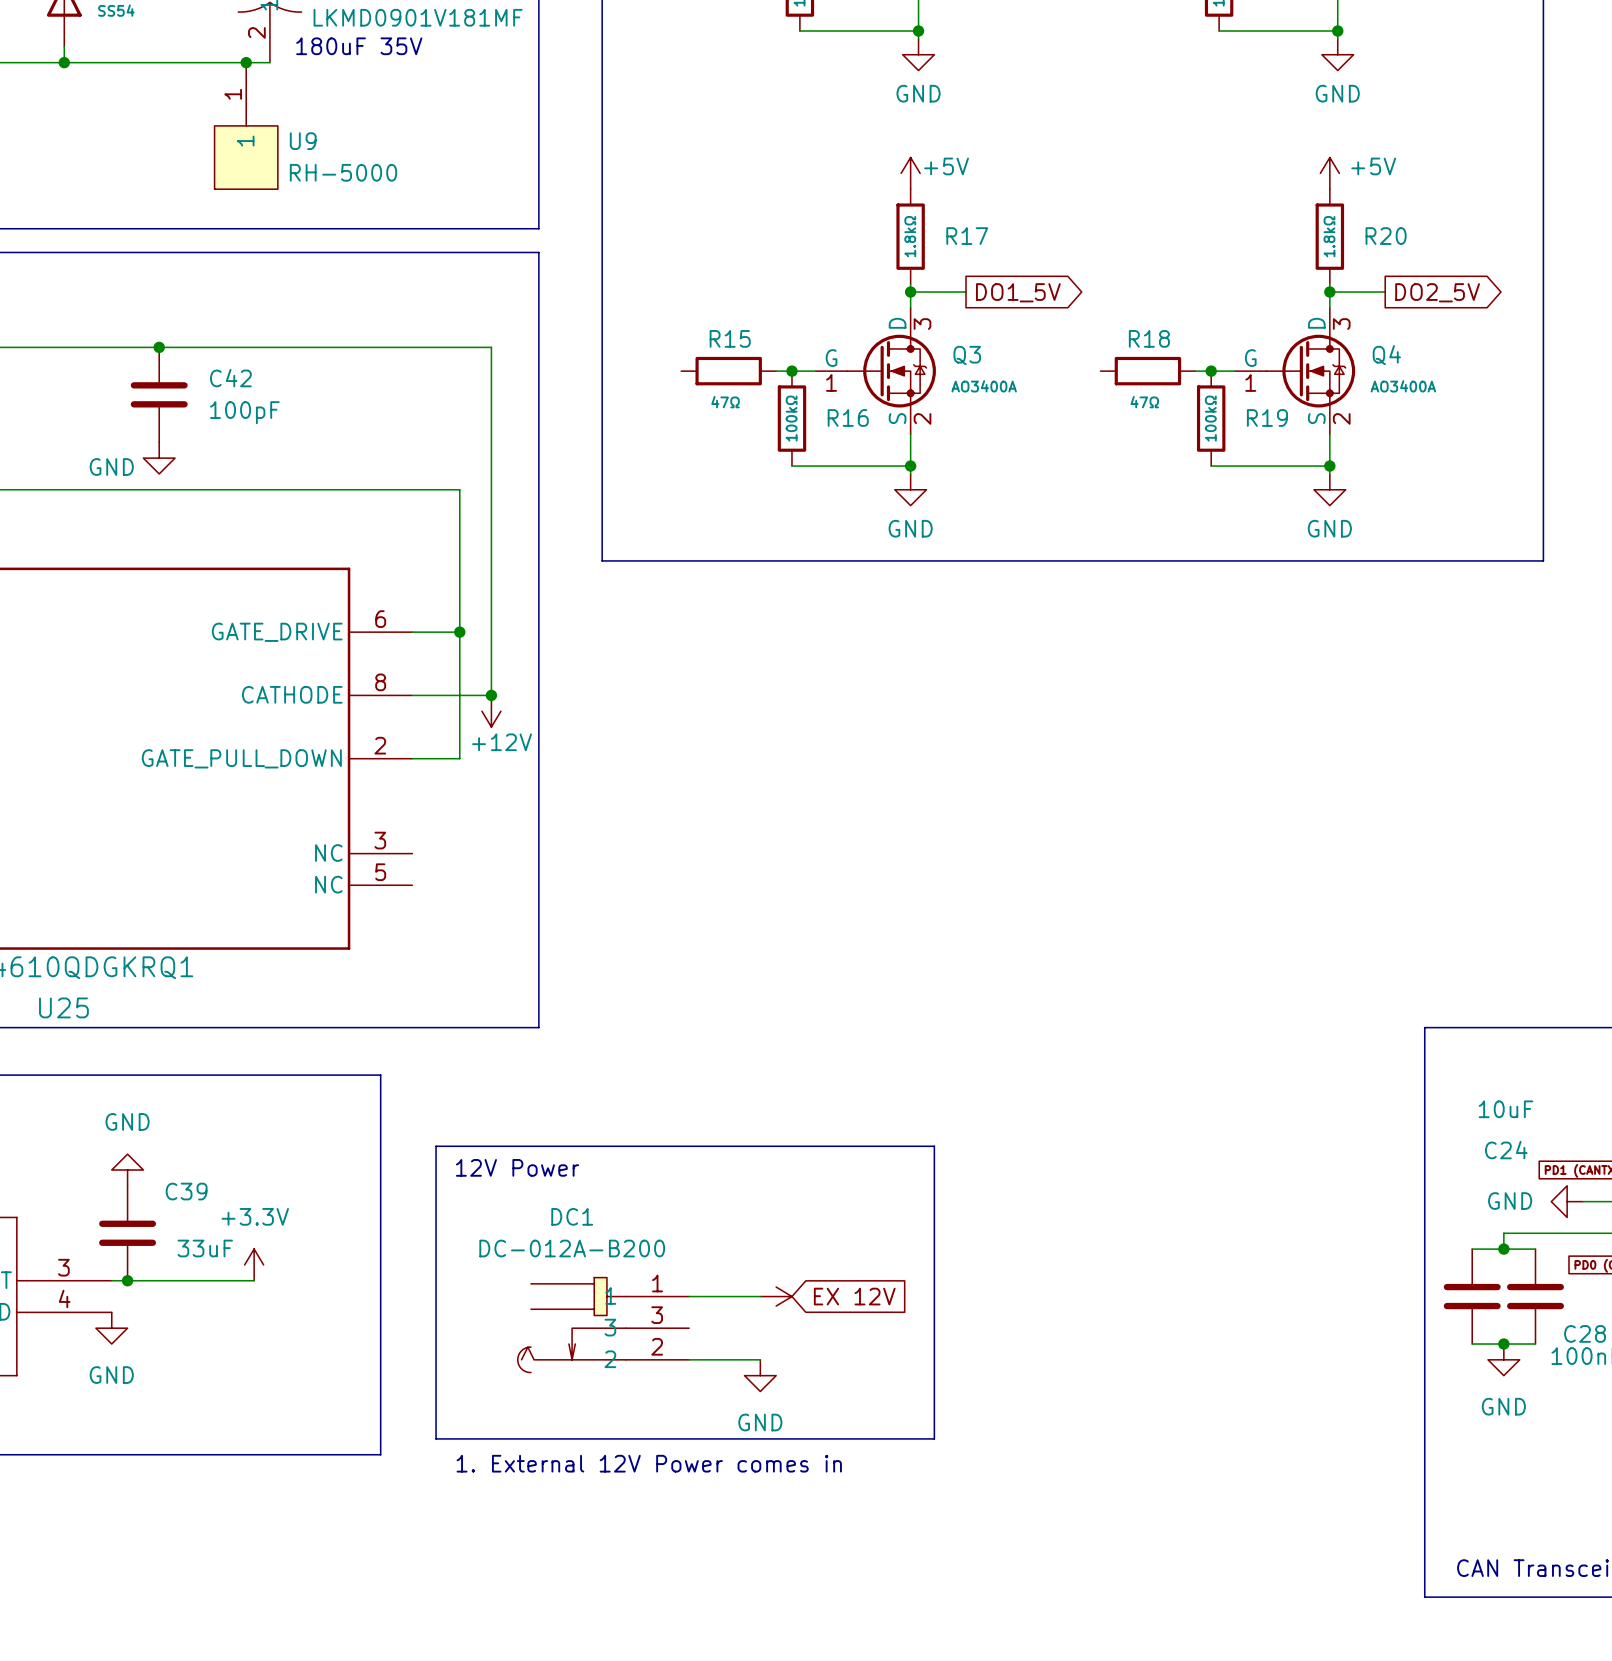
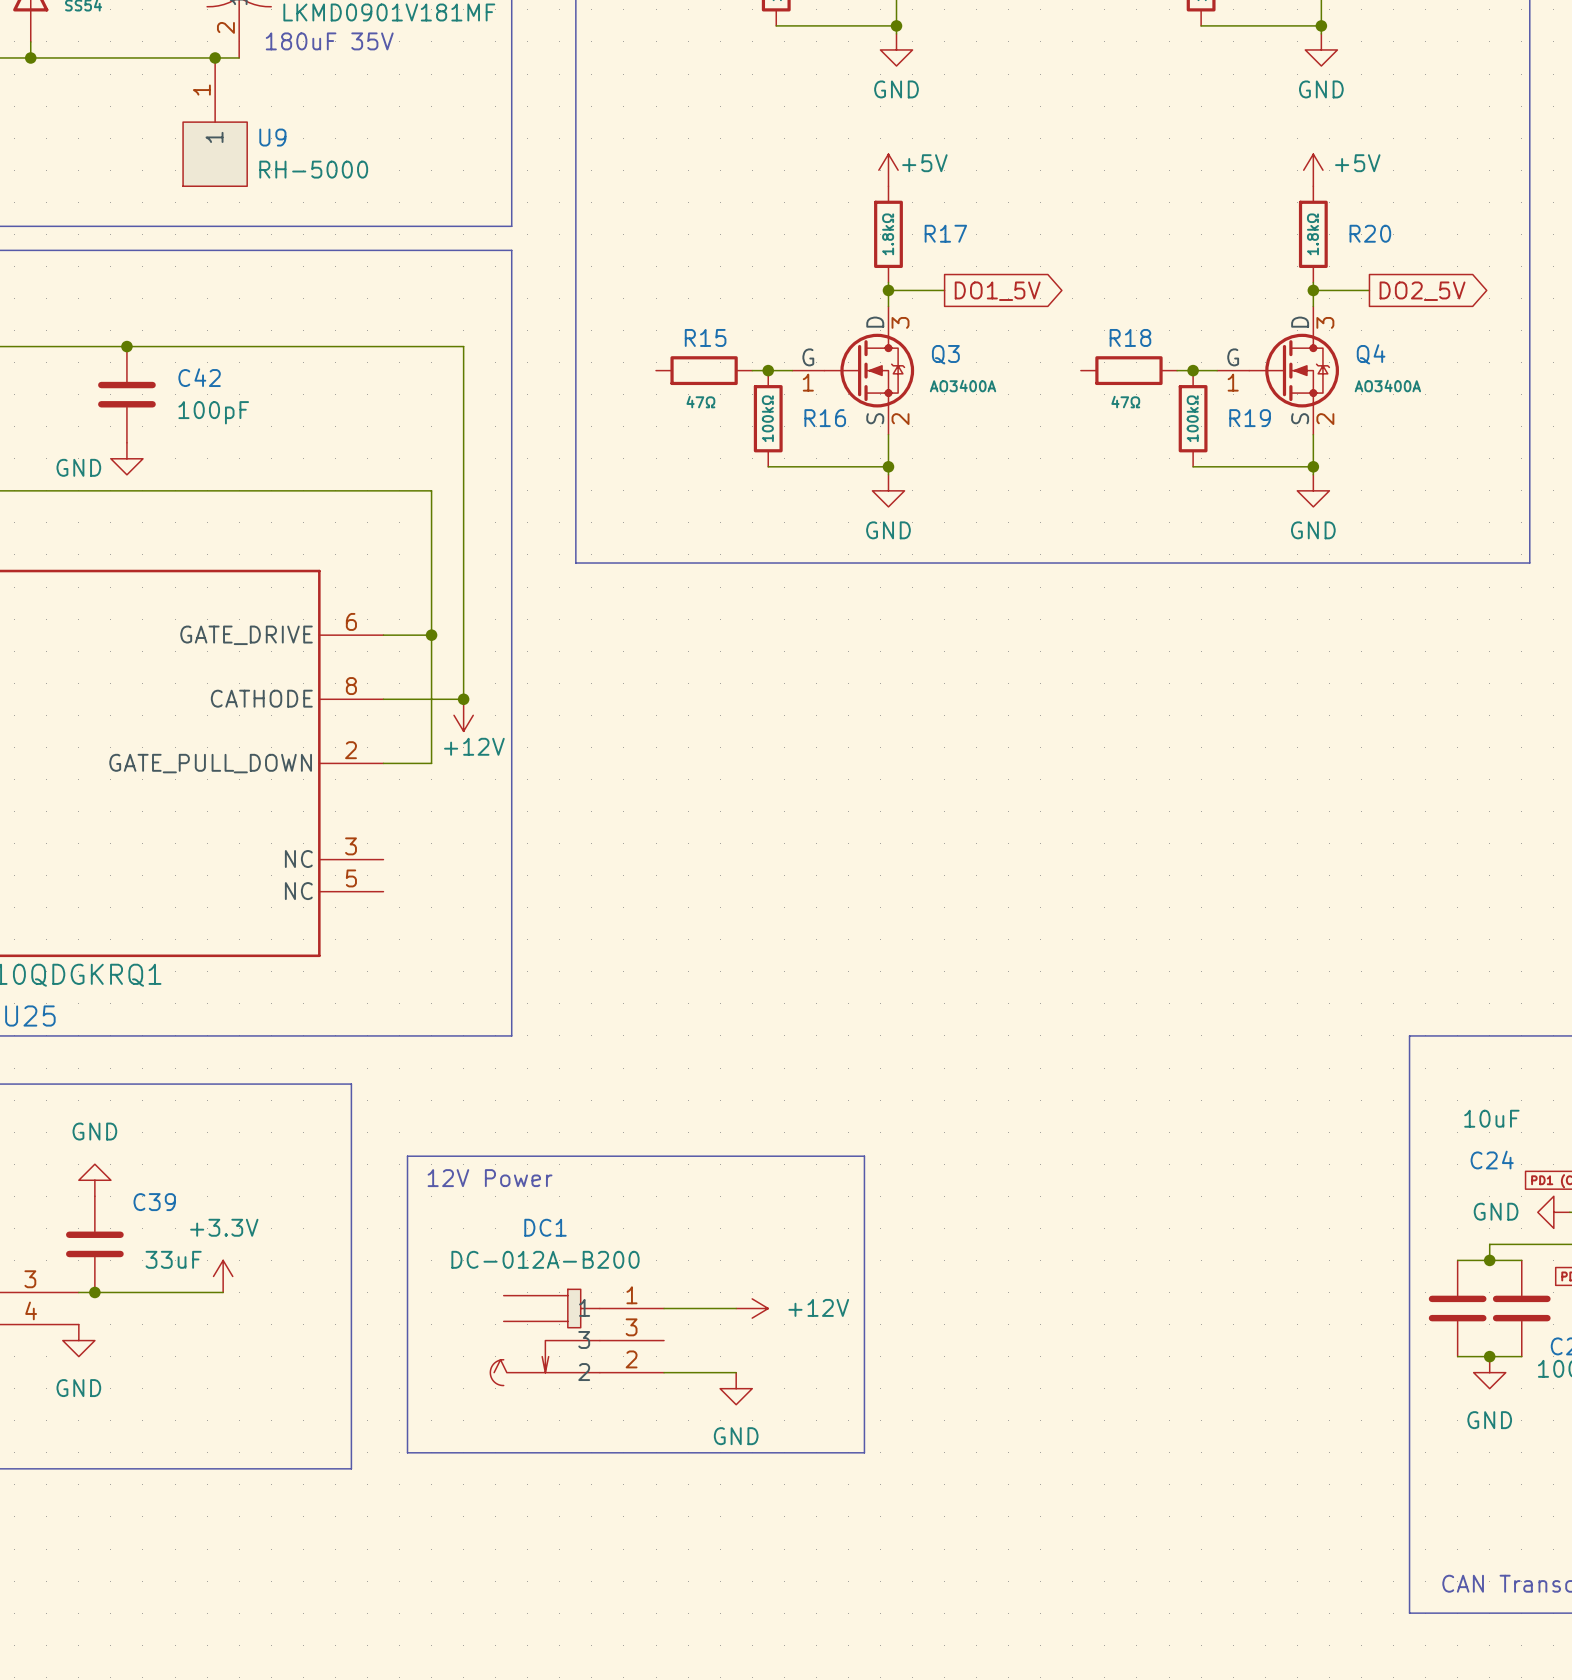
line: (886, 1146) (934, 1146) (934, 1438) (886, 1438) -> (864, 1156) (864, 1452)
power symbol text: none -> +12V (818, 1307)
global label: EX 12V (854, 1296) -> none
text: 1. External 12V Power comes in (649, 1463) -> none

